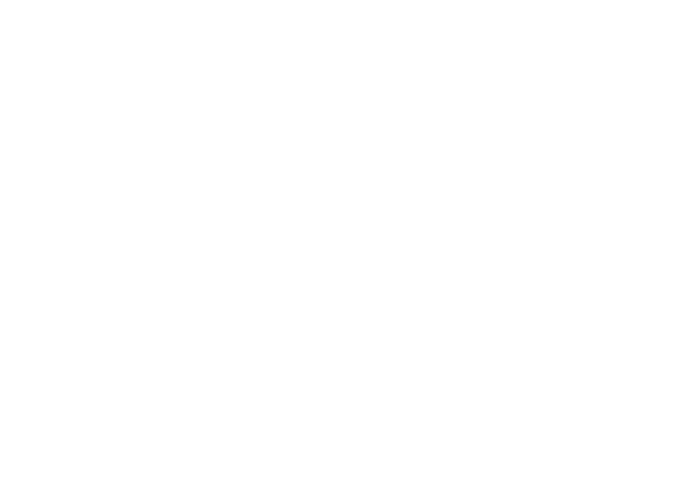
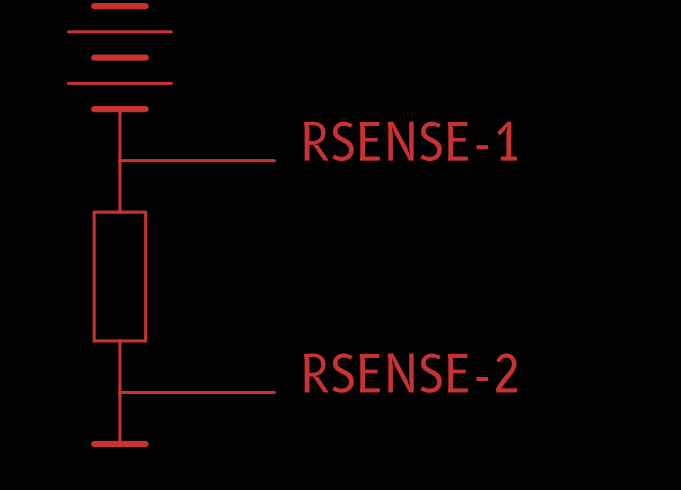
line: none -> (94, 6) (145, 6)
line: none -> (68, 31) (171, 31)
line: none -> (94, 57) (145, 57)
line: none -> (68, 83) (171, 83)
line: none -> (94, 109) (145, 109)
line: none -> (119, 109) (119, 212)
text: none -> RSENSE-1 (410, 141)
line: none -> (119, 160) (274, 160)
line: none -> (94, 212) (145, 212) (145, 340) (94, 340) (94, 212)
line: none -> (119, 340) (119, 443)
text: none -> RSENSE-2 (410, 373)
line: none -> (119, 392) (274, 392)
line: none -> (94, 443) (145, 443)

